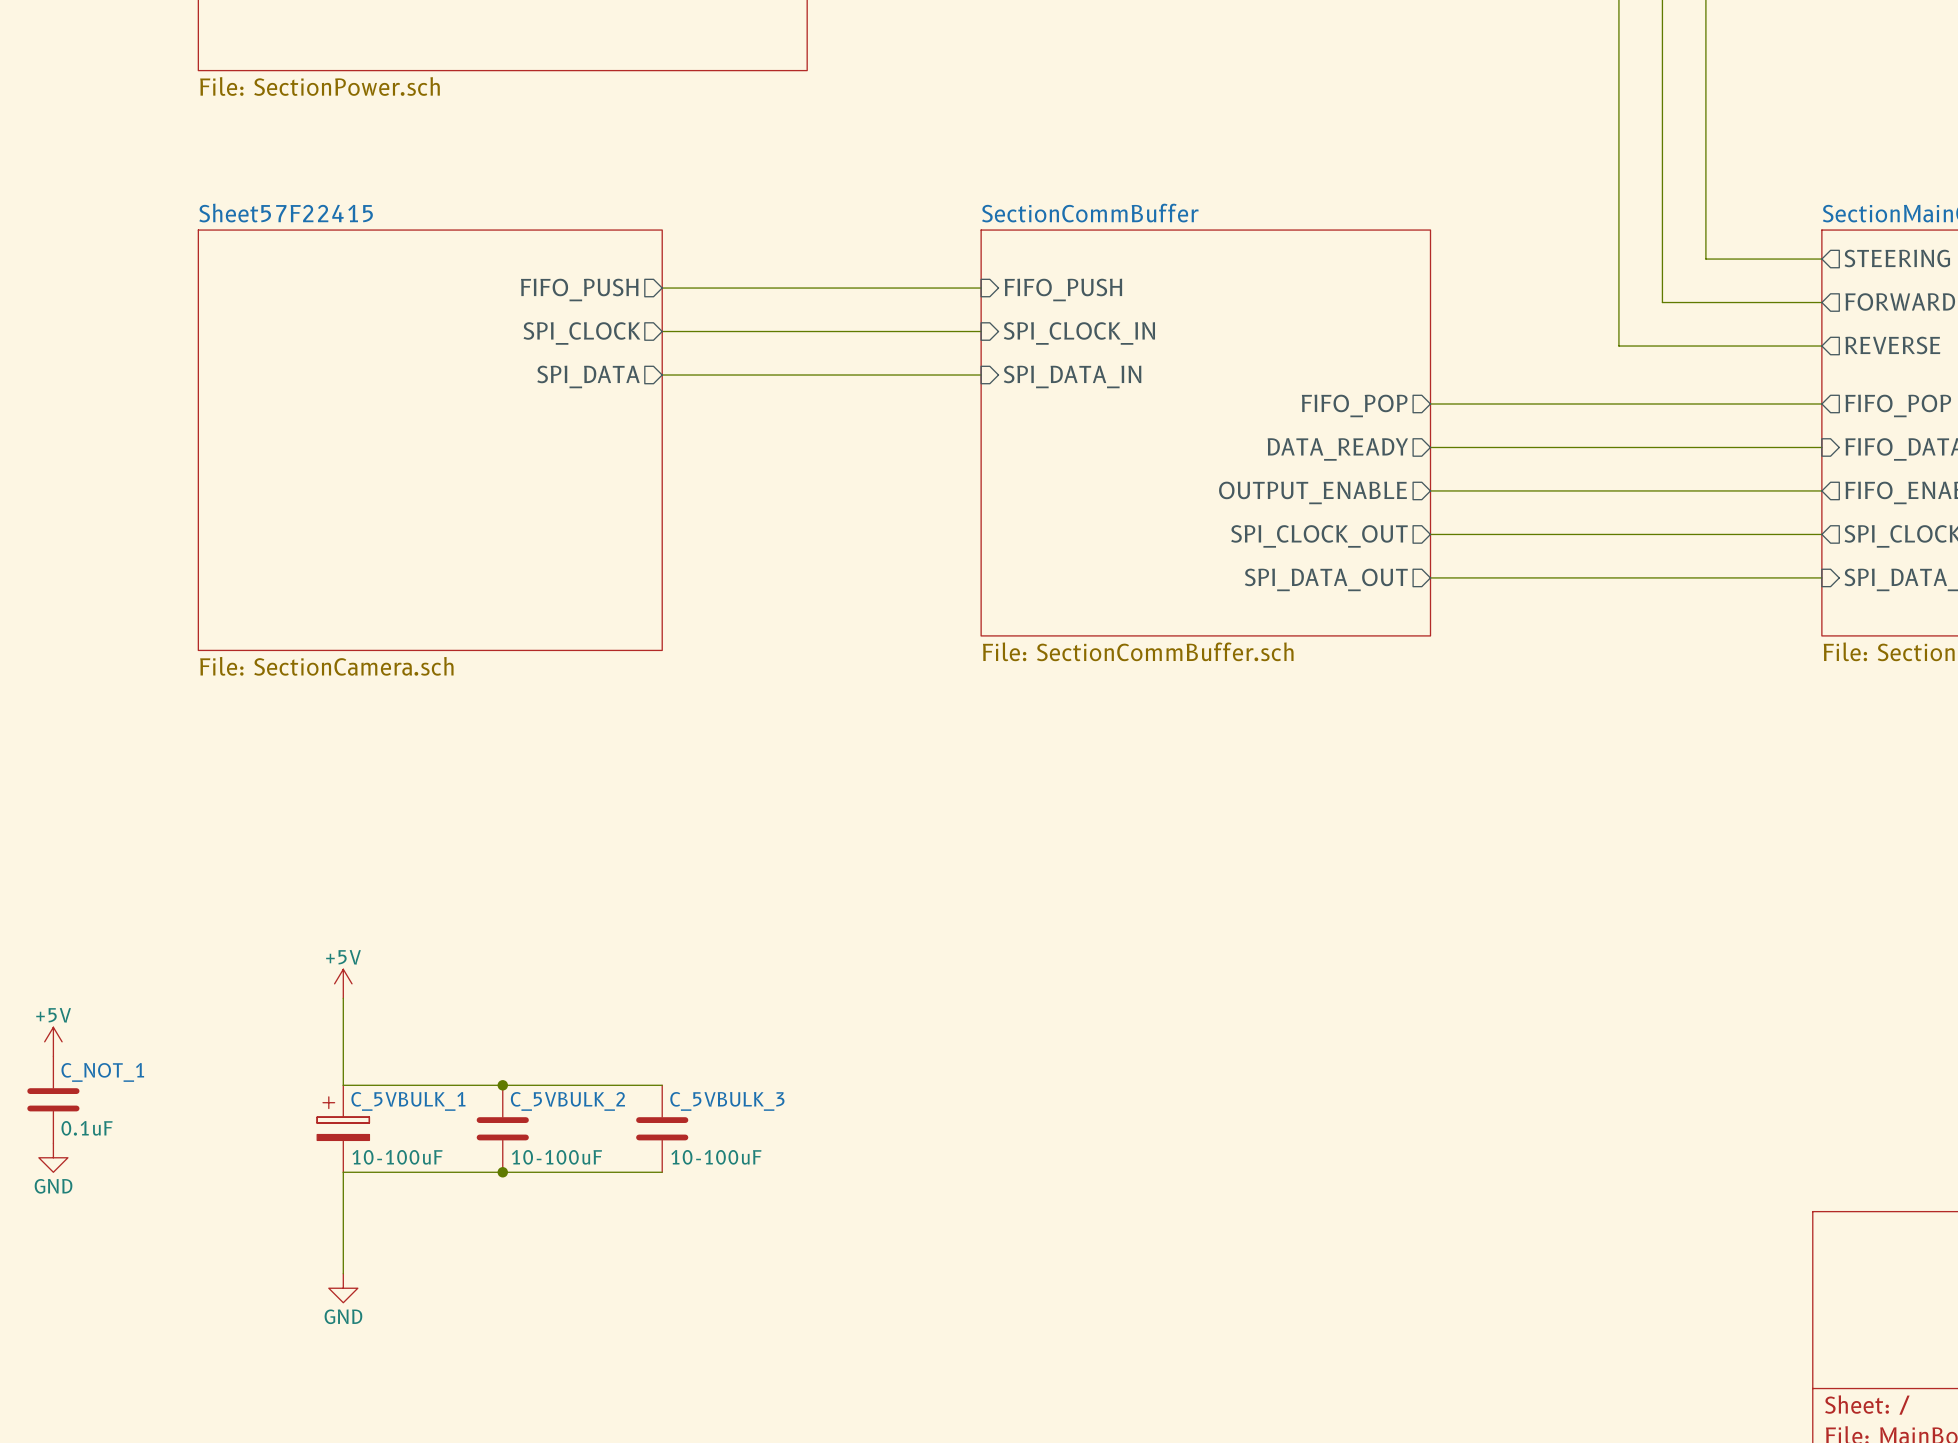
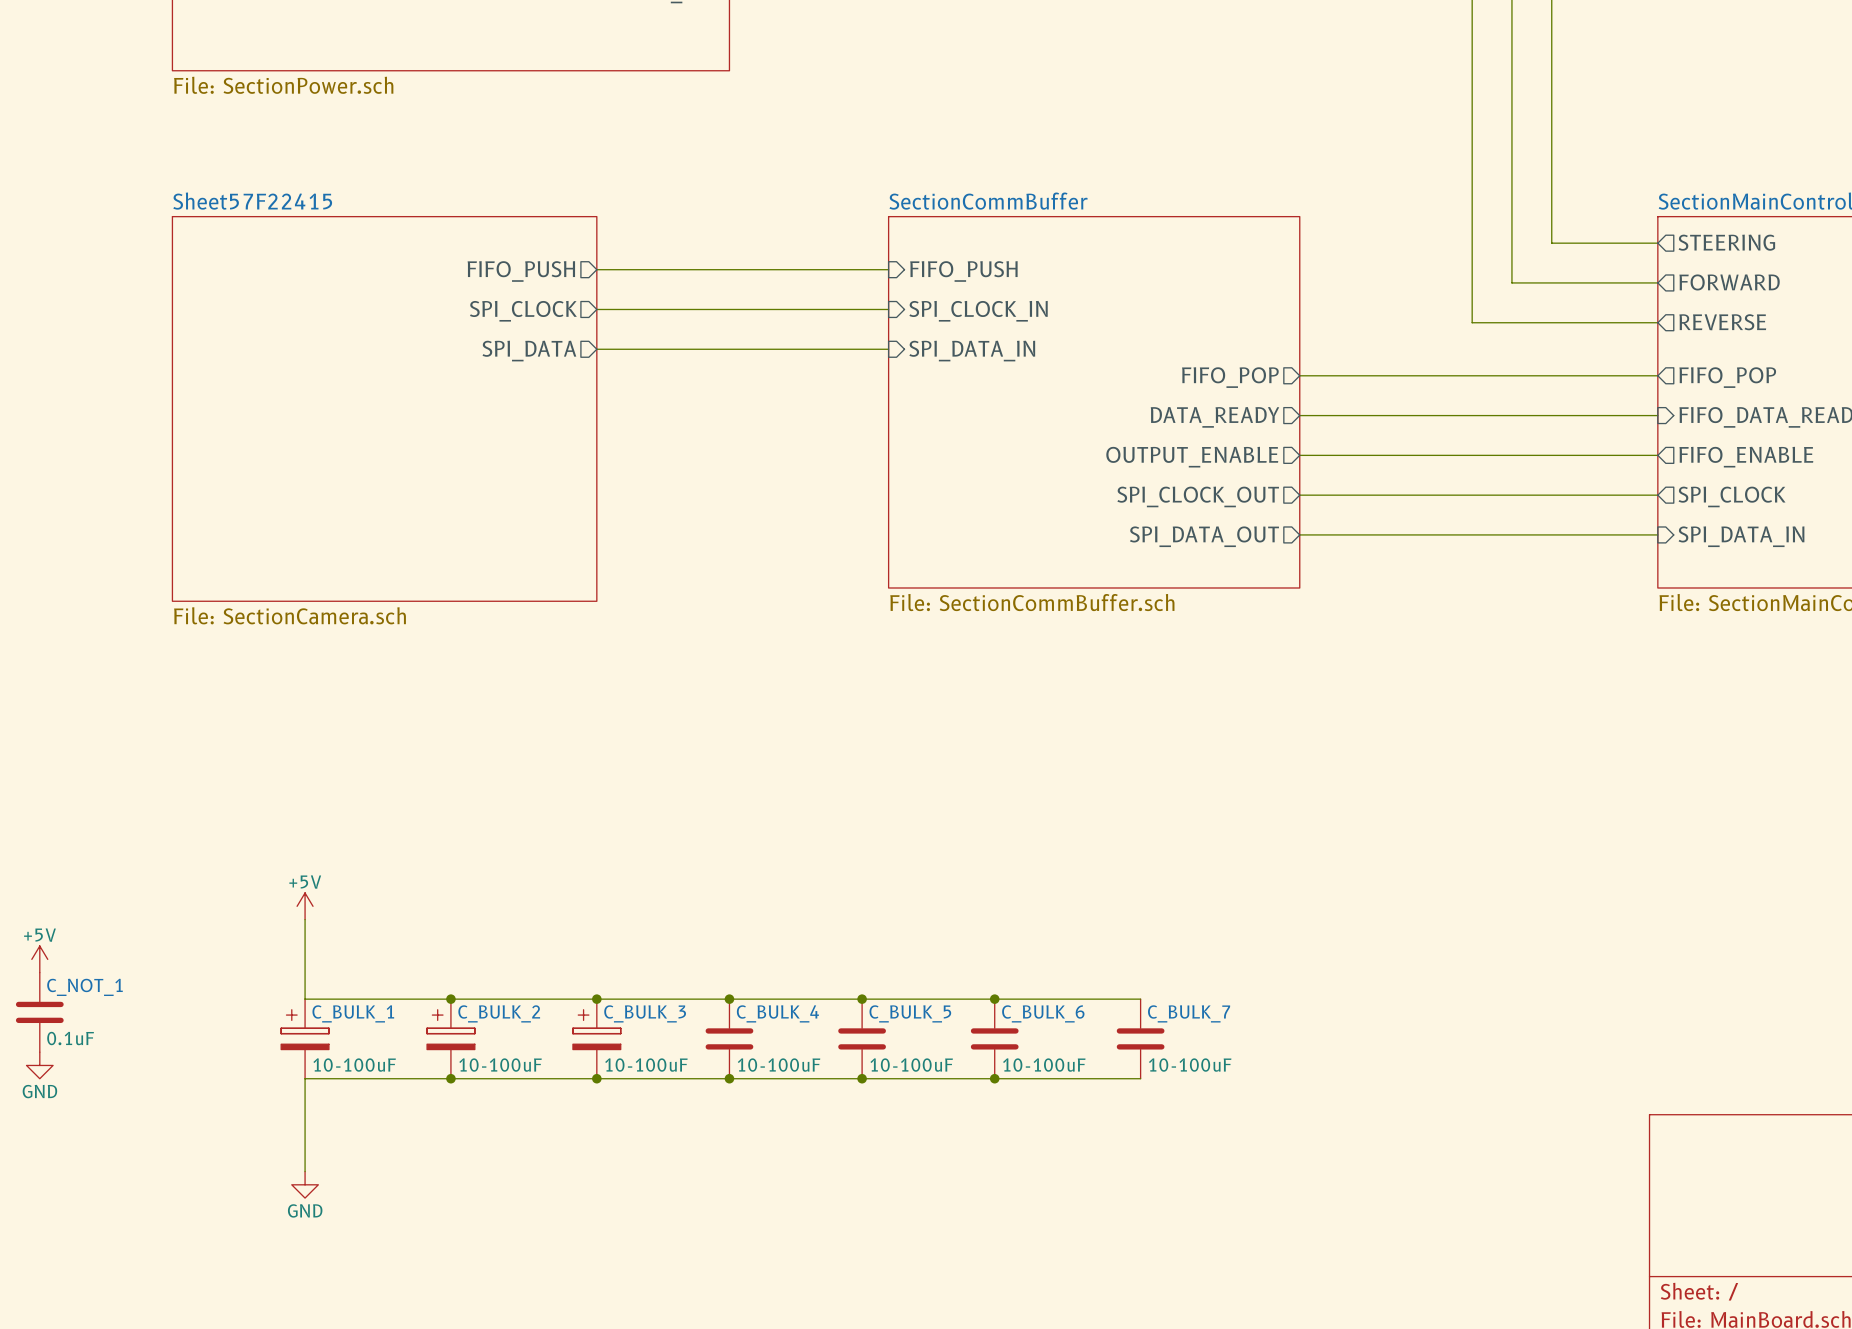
wire: none -> (596, 999) (1140, 999)
junction: none -> (596, 999)
junction: none -> (729, 999)
junction: none -> (862, 999)
junction: none -> (994, 999)
C_5VBULK_1 name: C_5VBULK_1 (408, 1101) -> C_BULK_1 (353, 1013)
C_5VBULK_2: 10-100uF (502, 1128) -> none
C_BULK_2: none -> 10-100uF (450, 1038)
C_5VBULK_3: 10-100uF (662, 1128) -> none
C_BULK_3: none -> 10-100uF (596, 1038)
C_BULK_4: none -> 10-100uF (729, 1038)
C_BULK_5: none -> 10-100uF (862, 1038)
C_BULK_6: none -> 10-100uF (994, 1038)
C_BULK_7: none -> 10-100uF (1140, 1038)
wire: none -> (596, 1078) (1140, 1078)
junction: none -> (596, 1078)
junction: none -> (729, 1078)
junction: none -> (862, 1078)
junction: none -> (994, 1078)

